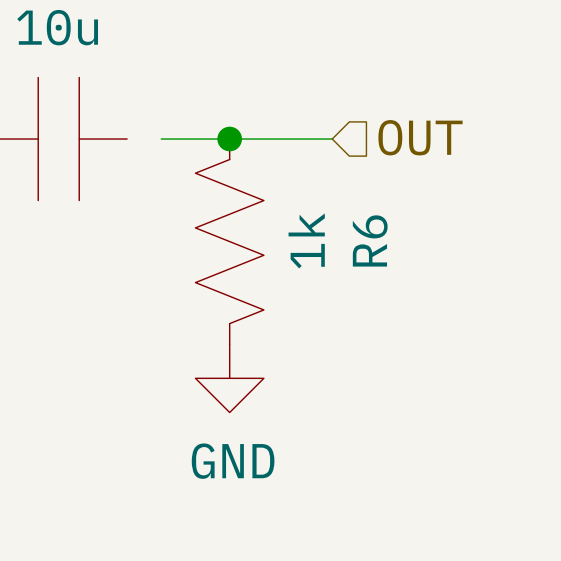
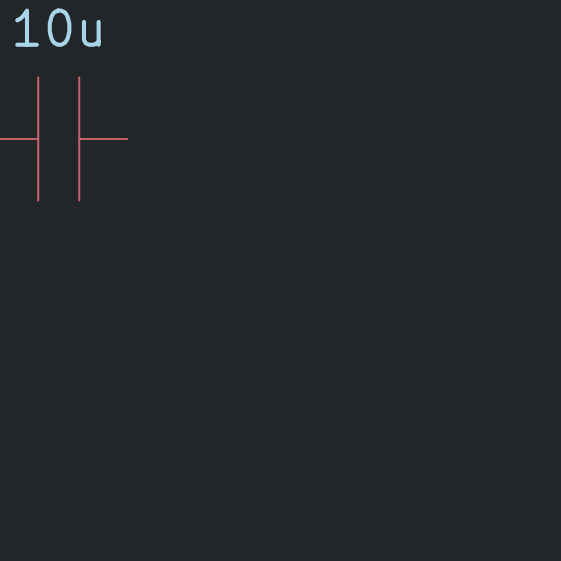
hierarchical label: OUT (420, 137) -> none
wire: (161, 139) (332, 139) -> none
junction: (229, 139) -> none
R6: 1k (229, 241) -> none
power symbol: GND (229, 378) -> none

